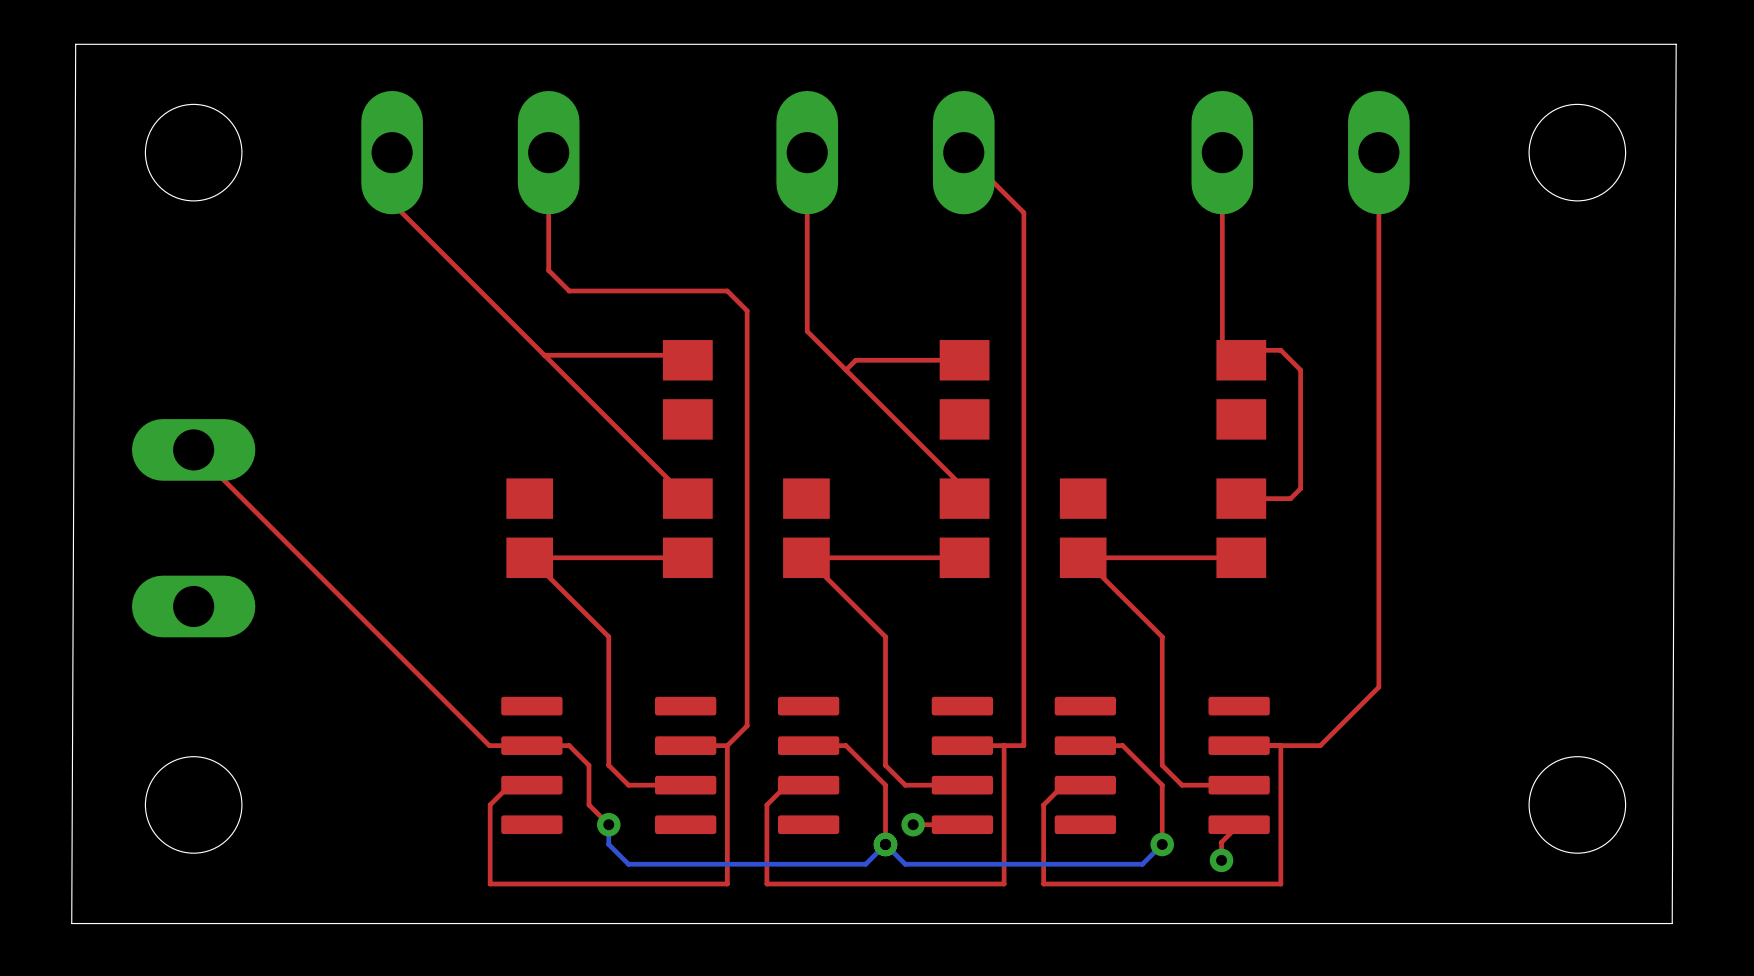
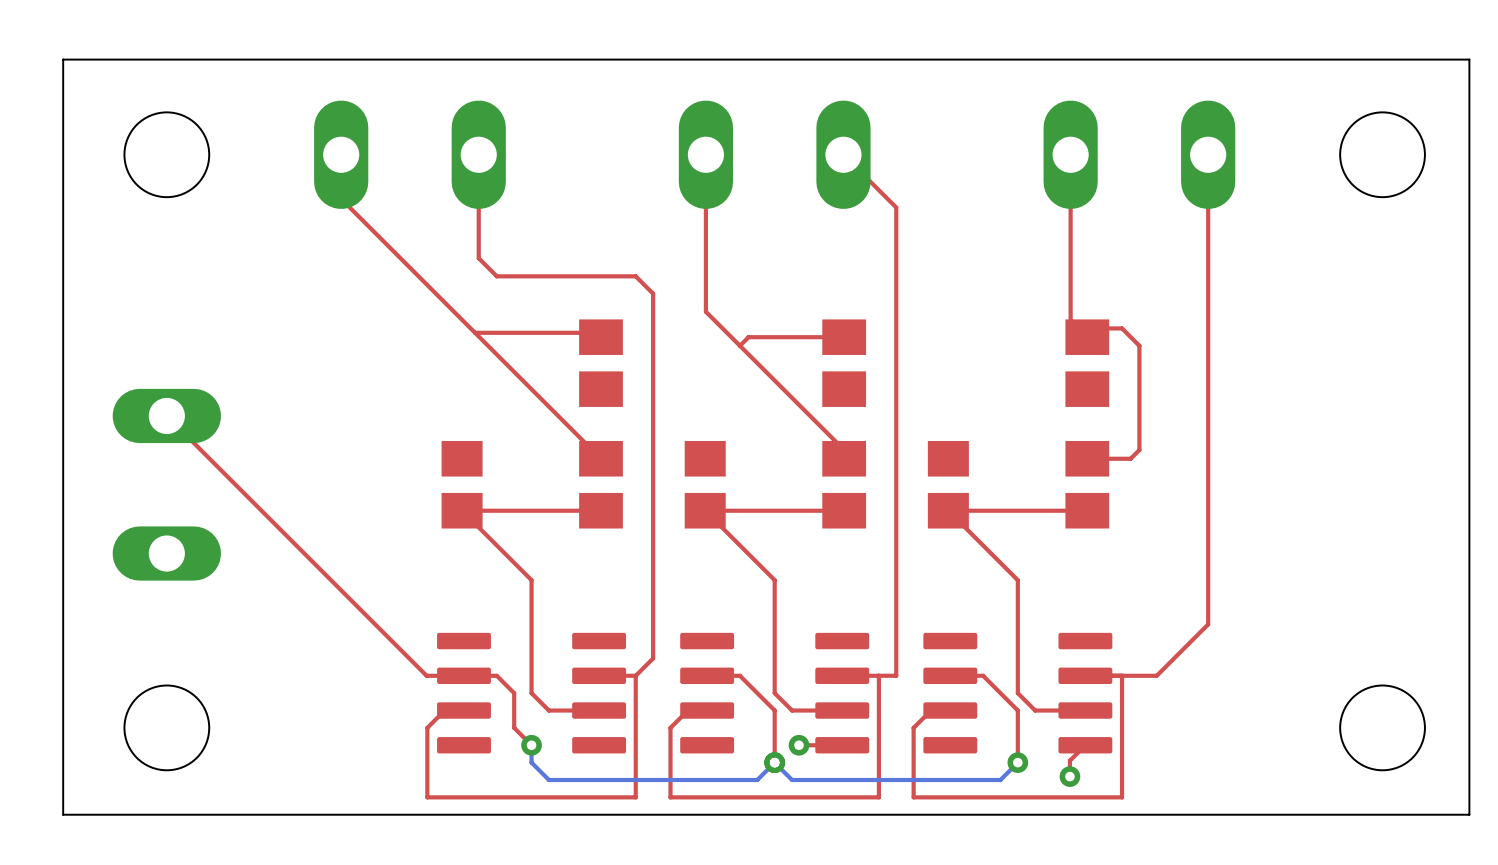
board edge: (1676, 44) (1672, 923) (71, 923) (75, 44) -> (1469, 59) (1469, 814) (63, 814) (63, 59)

